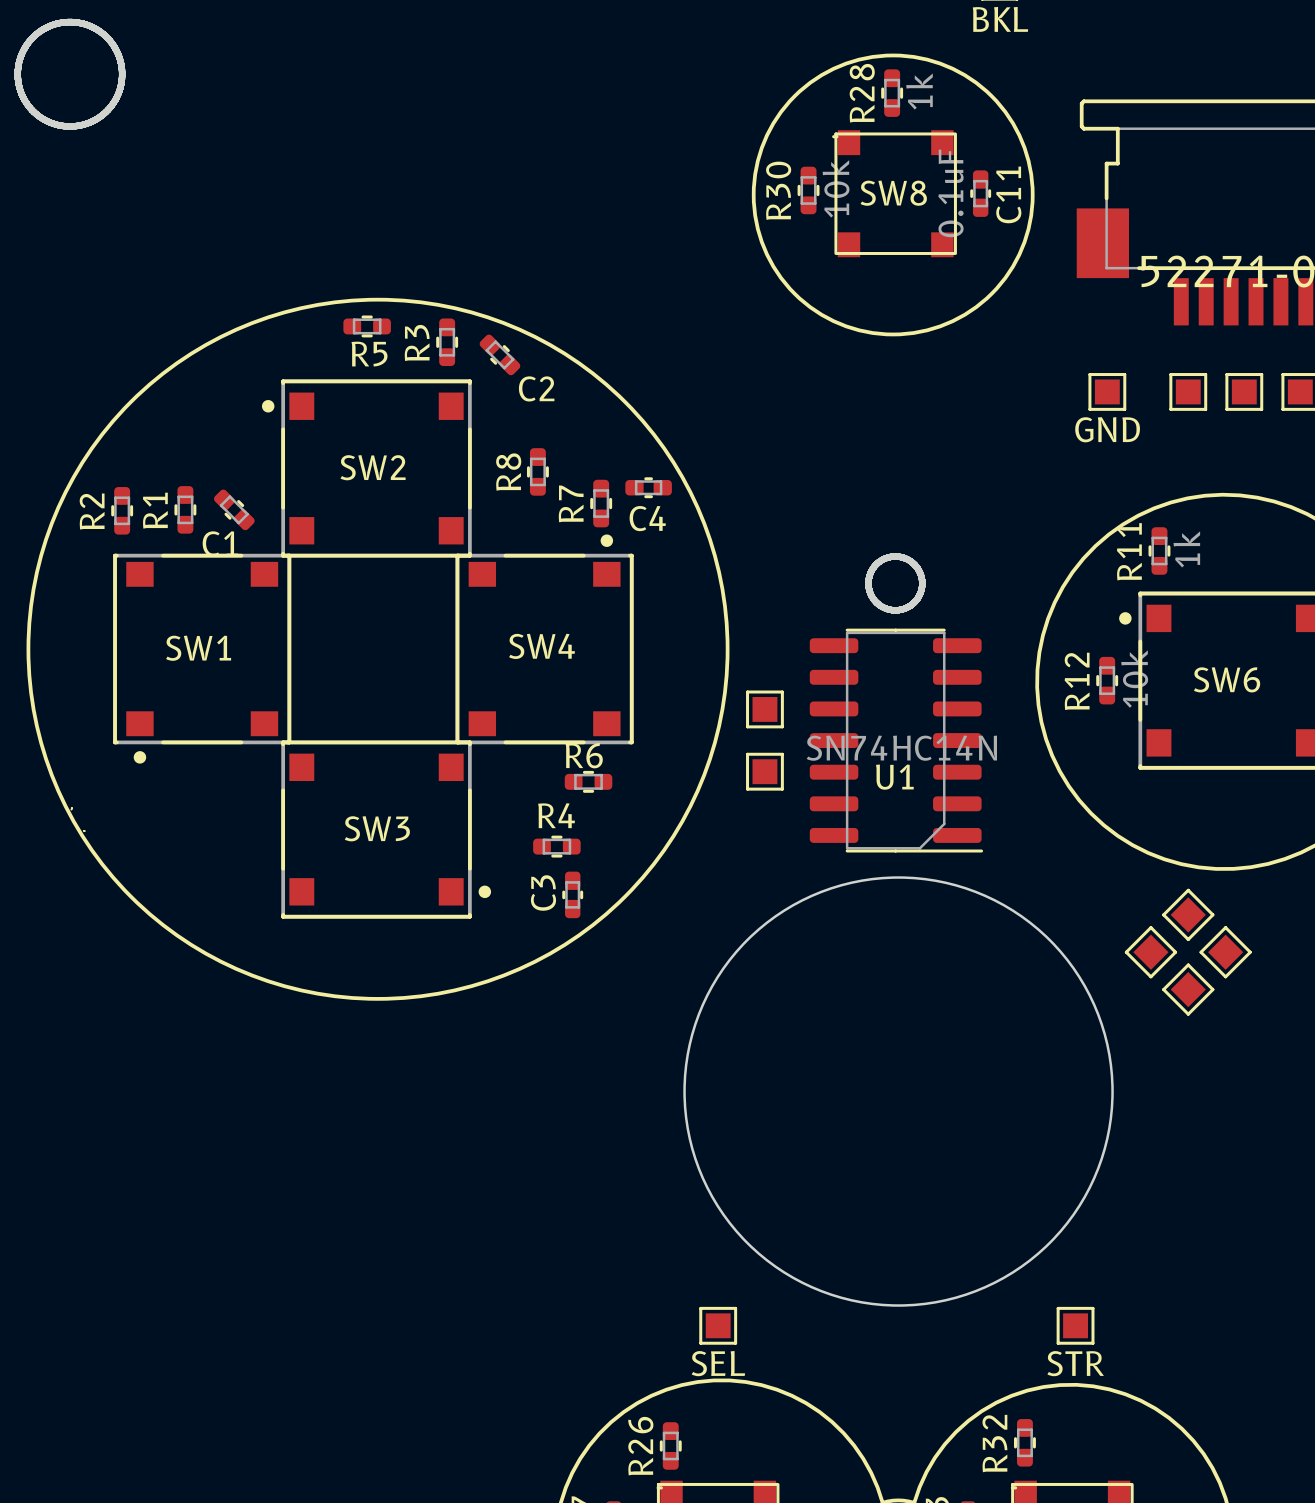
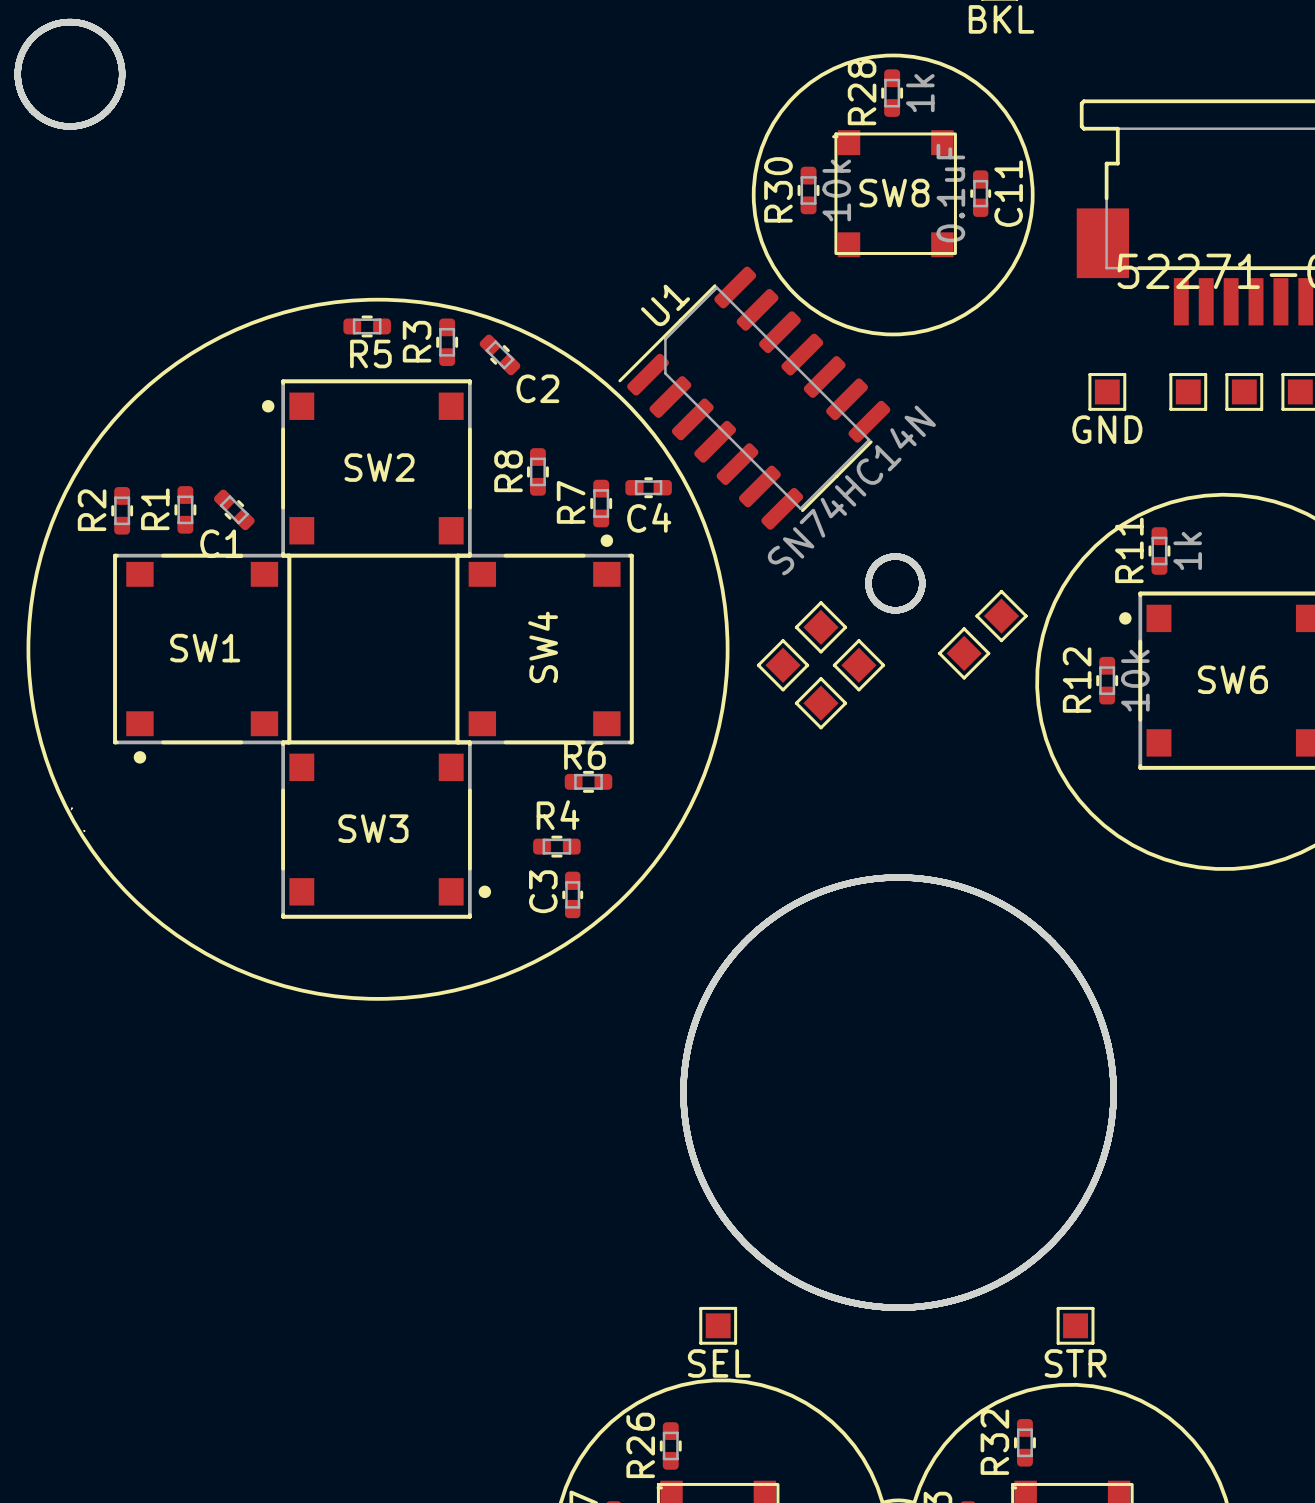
part: none -> (1001, 616)
part: none -> (820, 627)
SW4 name rotation: 0° (542, 646) -> 90° counterclockwise (543, 647)
part: none -> (964, 653)
part: none -> (783, 665)
part: none -> (858, 665)
part: none -> (820, 703)
part: (764, 709) -> none
U1 rotation: 0° (896, 740) -> 135° clockwise (754, 398)
U1 position: (896, 740) -> (754, 398)
U1 value position: SN74HC14N (901, 748) -> SN74HC14N (851, 490)
part: (764, 771) -> none
U1 name position: U1 (894, 777) -> U1 (665, 305)
round board edge: [683, 876, 1114, 1307] -> none
board edge: none -> (895, 877) (850, 882) (813, 895) (773, 917) (744, 942) (719, 973) (698, 1013) (686, 1057) (683, 1095) (688, 1140) (701, 1177) (723, 1217) (748, 1246) (779, 1271) (819, 1292) (862, 1304) (901, 1307) (946, 1302) (983, 1290) (1023, 1267) (1052, 1242) (1077, 1212) (1098, 1171) (1110, 1128) (1113, 1089) (1108, 1044) (1095, 1007) (1073, 967) (1048, 938) (1018, 913) (977, 892) (934, 880) (895, 877)
part: (1188, 914) -> none
part: (1150, 952) -> none
part: (1225, 952) -> none
part: (1188, 989) -> none

